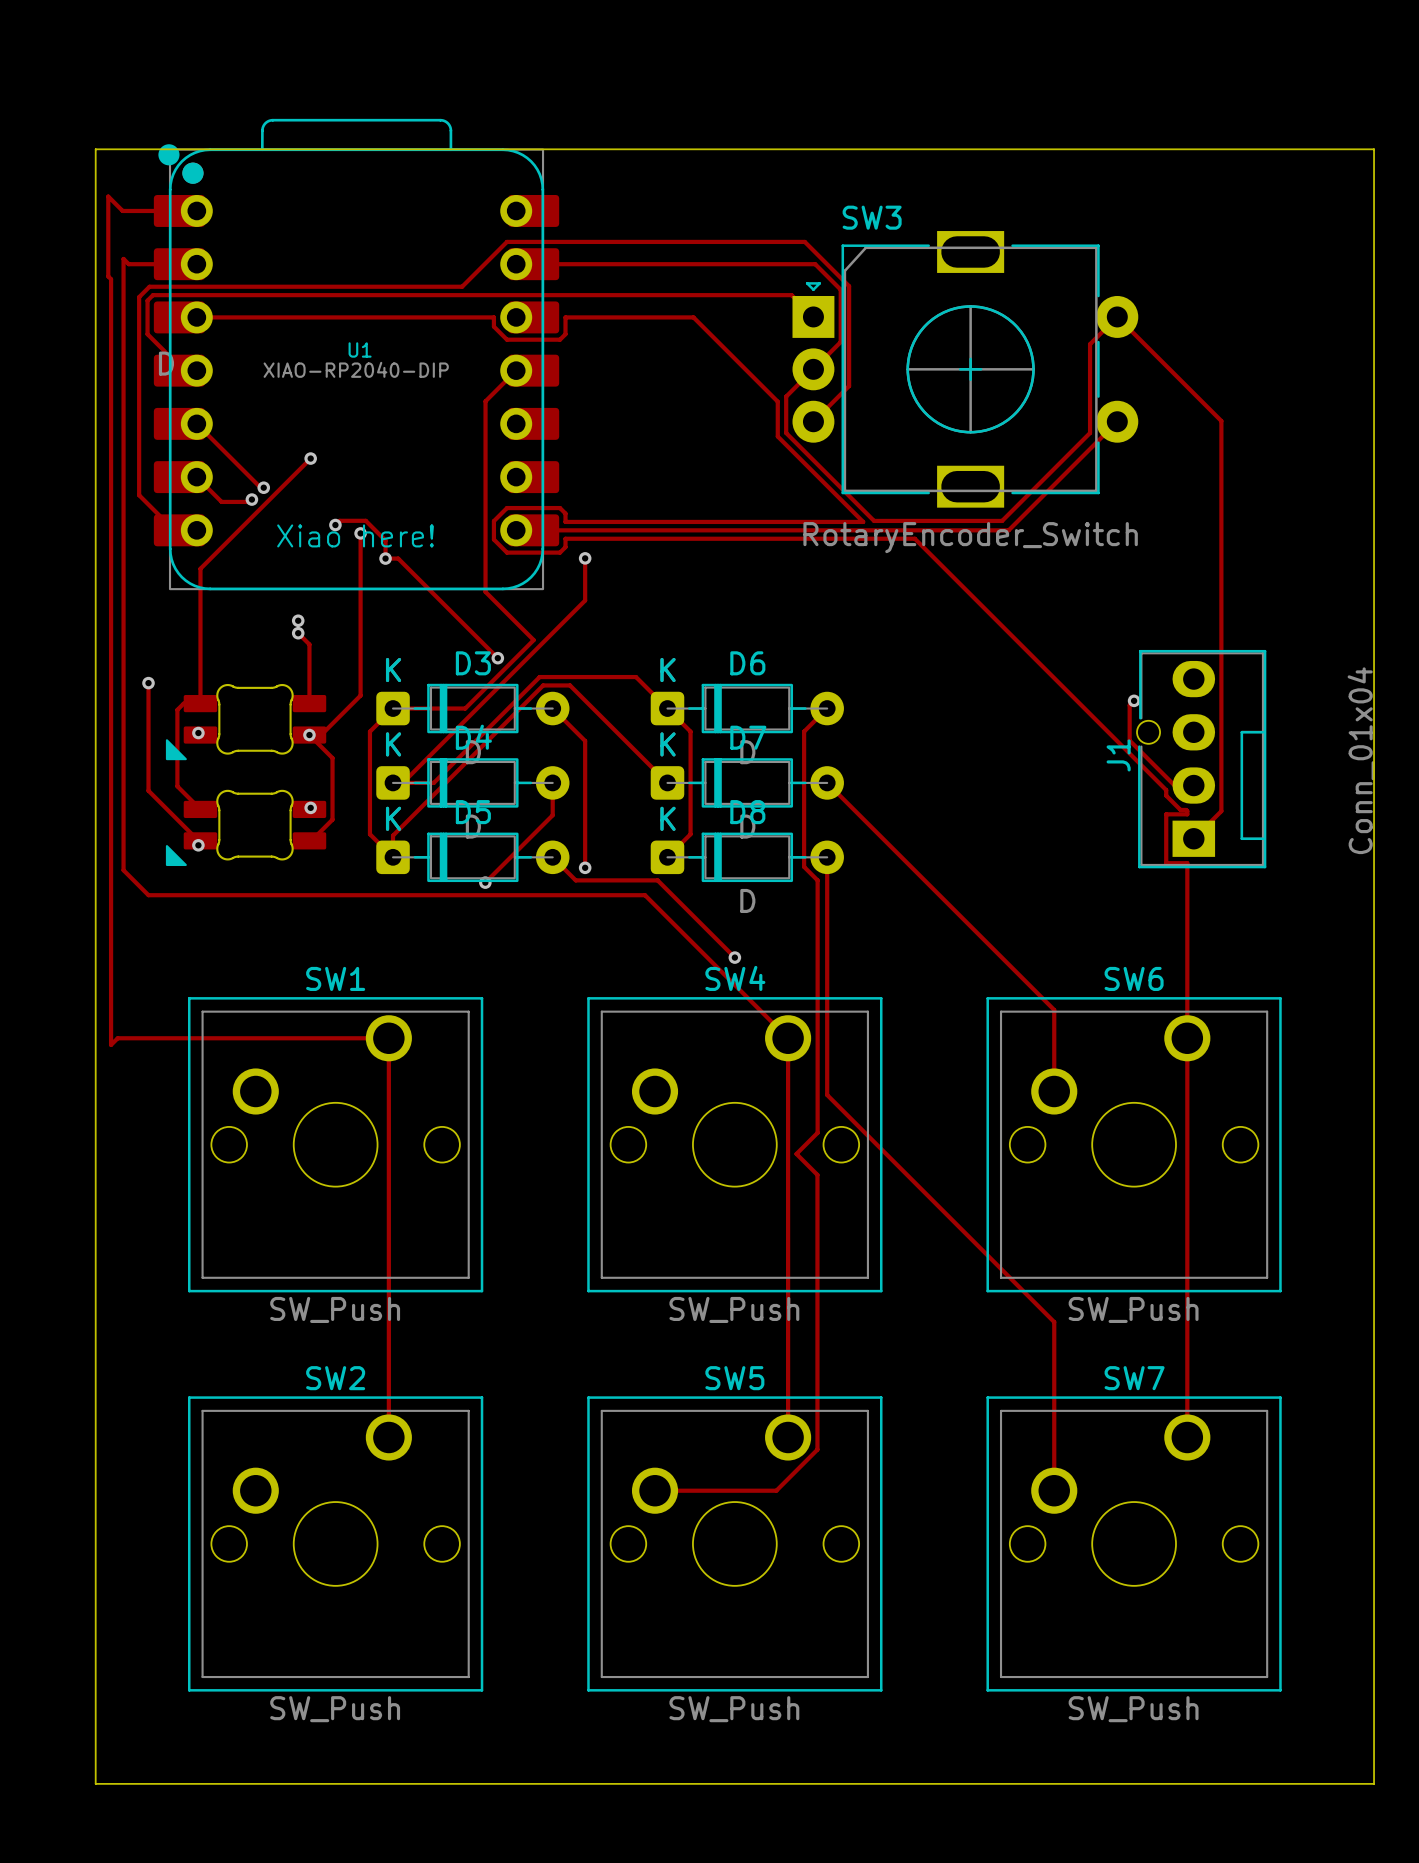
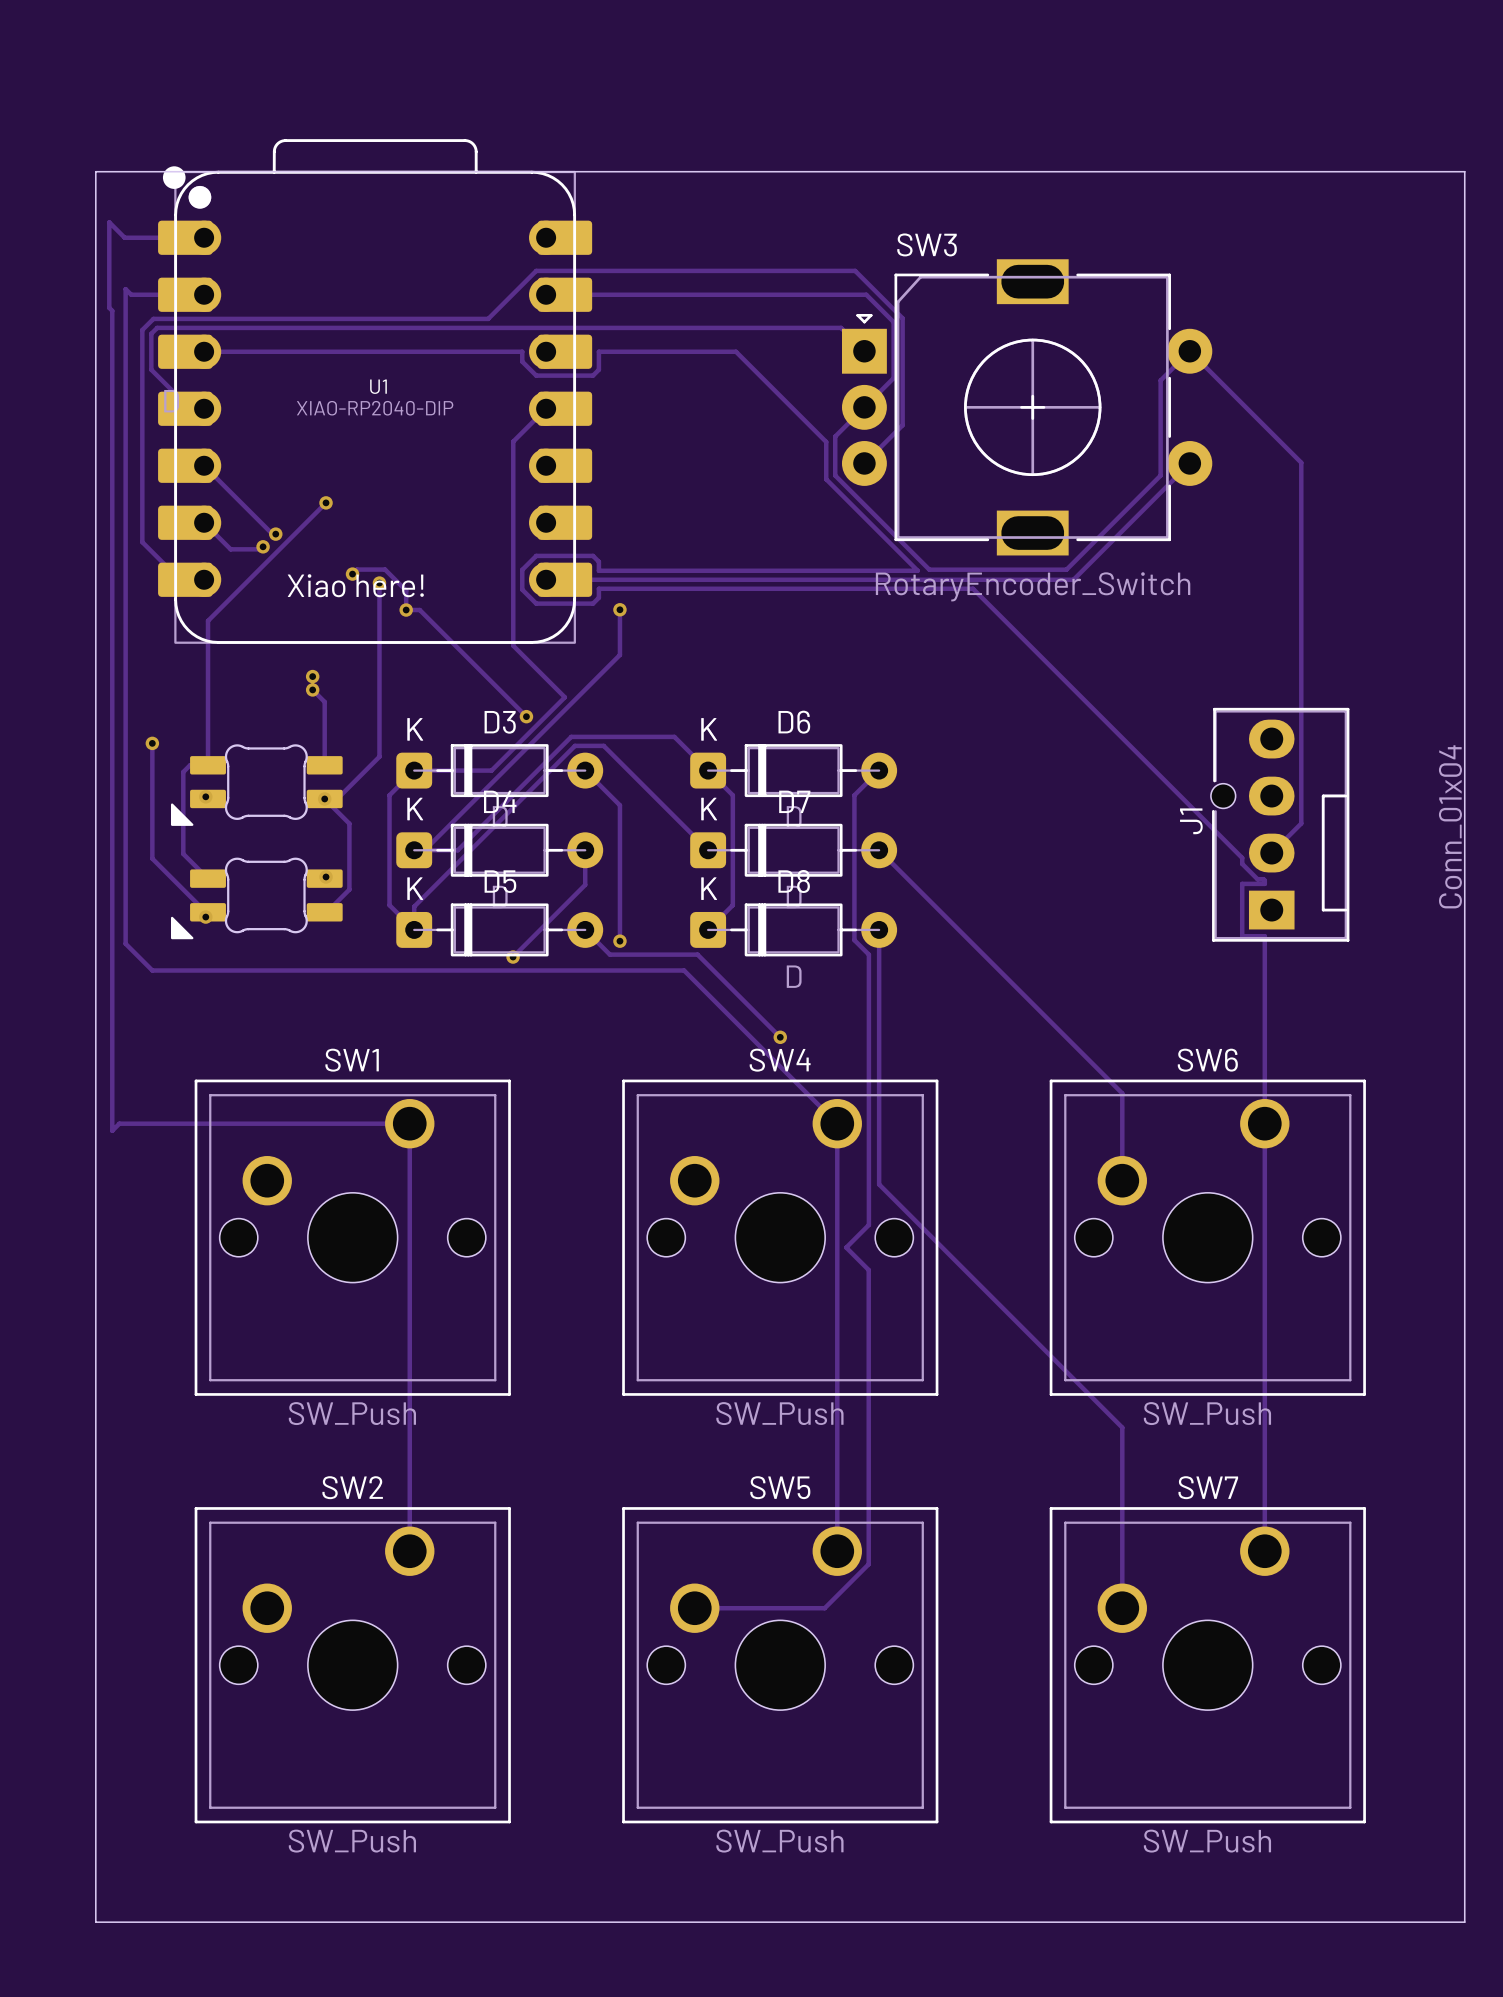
track: (1134, 700) (1129, 705) (1129, 740) (1174, 785) (1193, 785) -> none
via: (1134, 700) -> none
track: (1221, 757) (1221, 811) (1193, 838) -> (1301, 823) (1271, 853)

